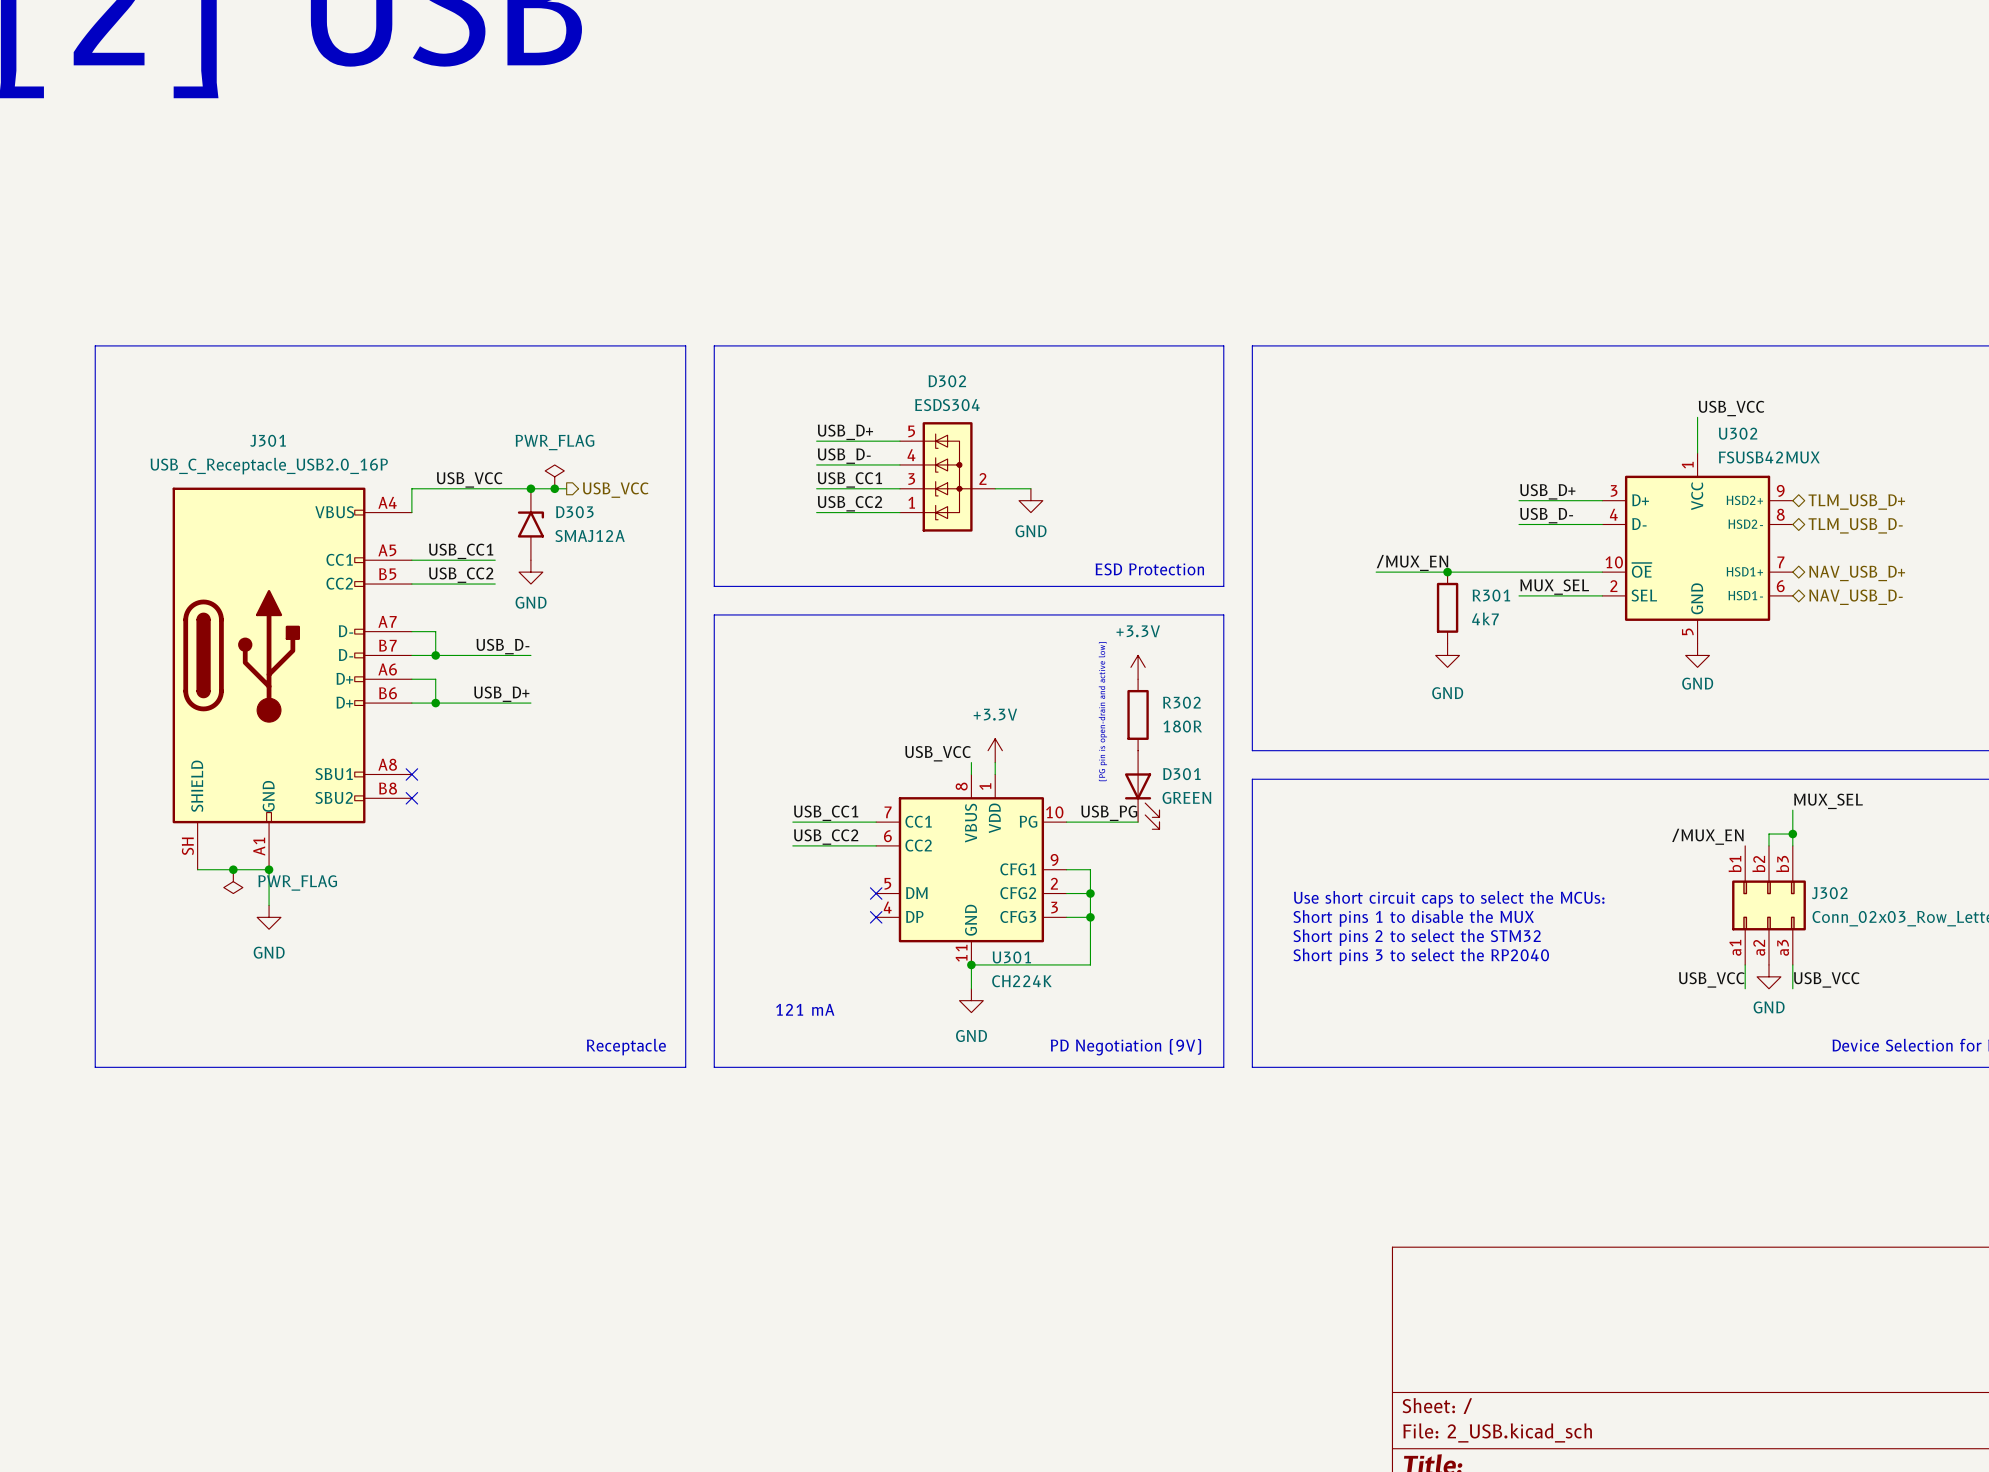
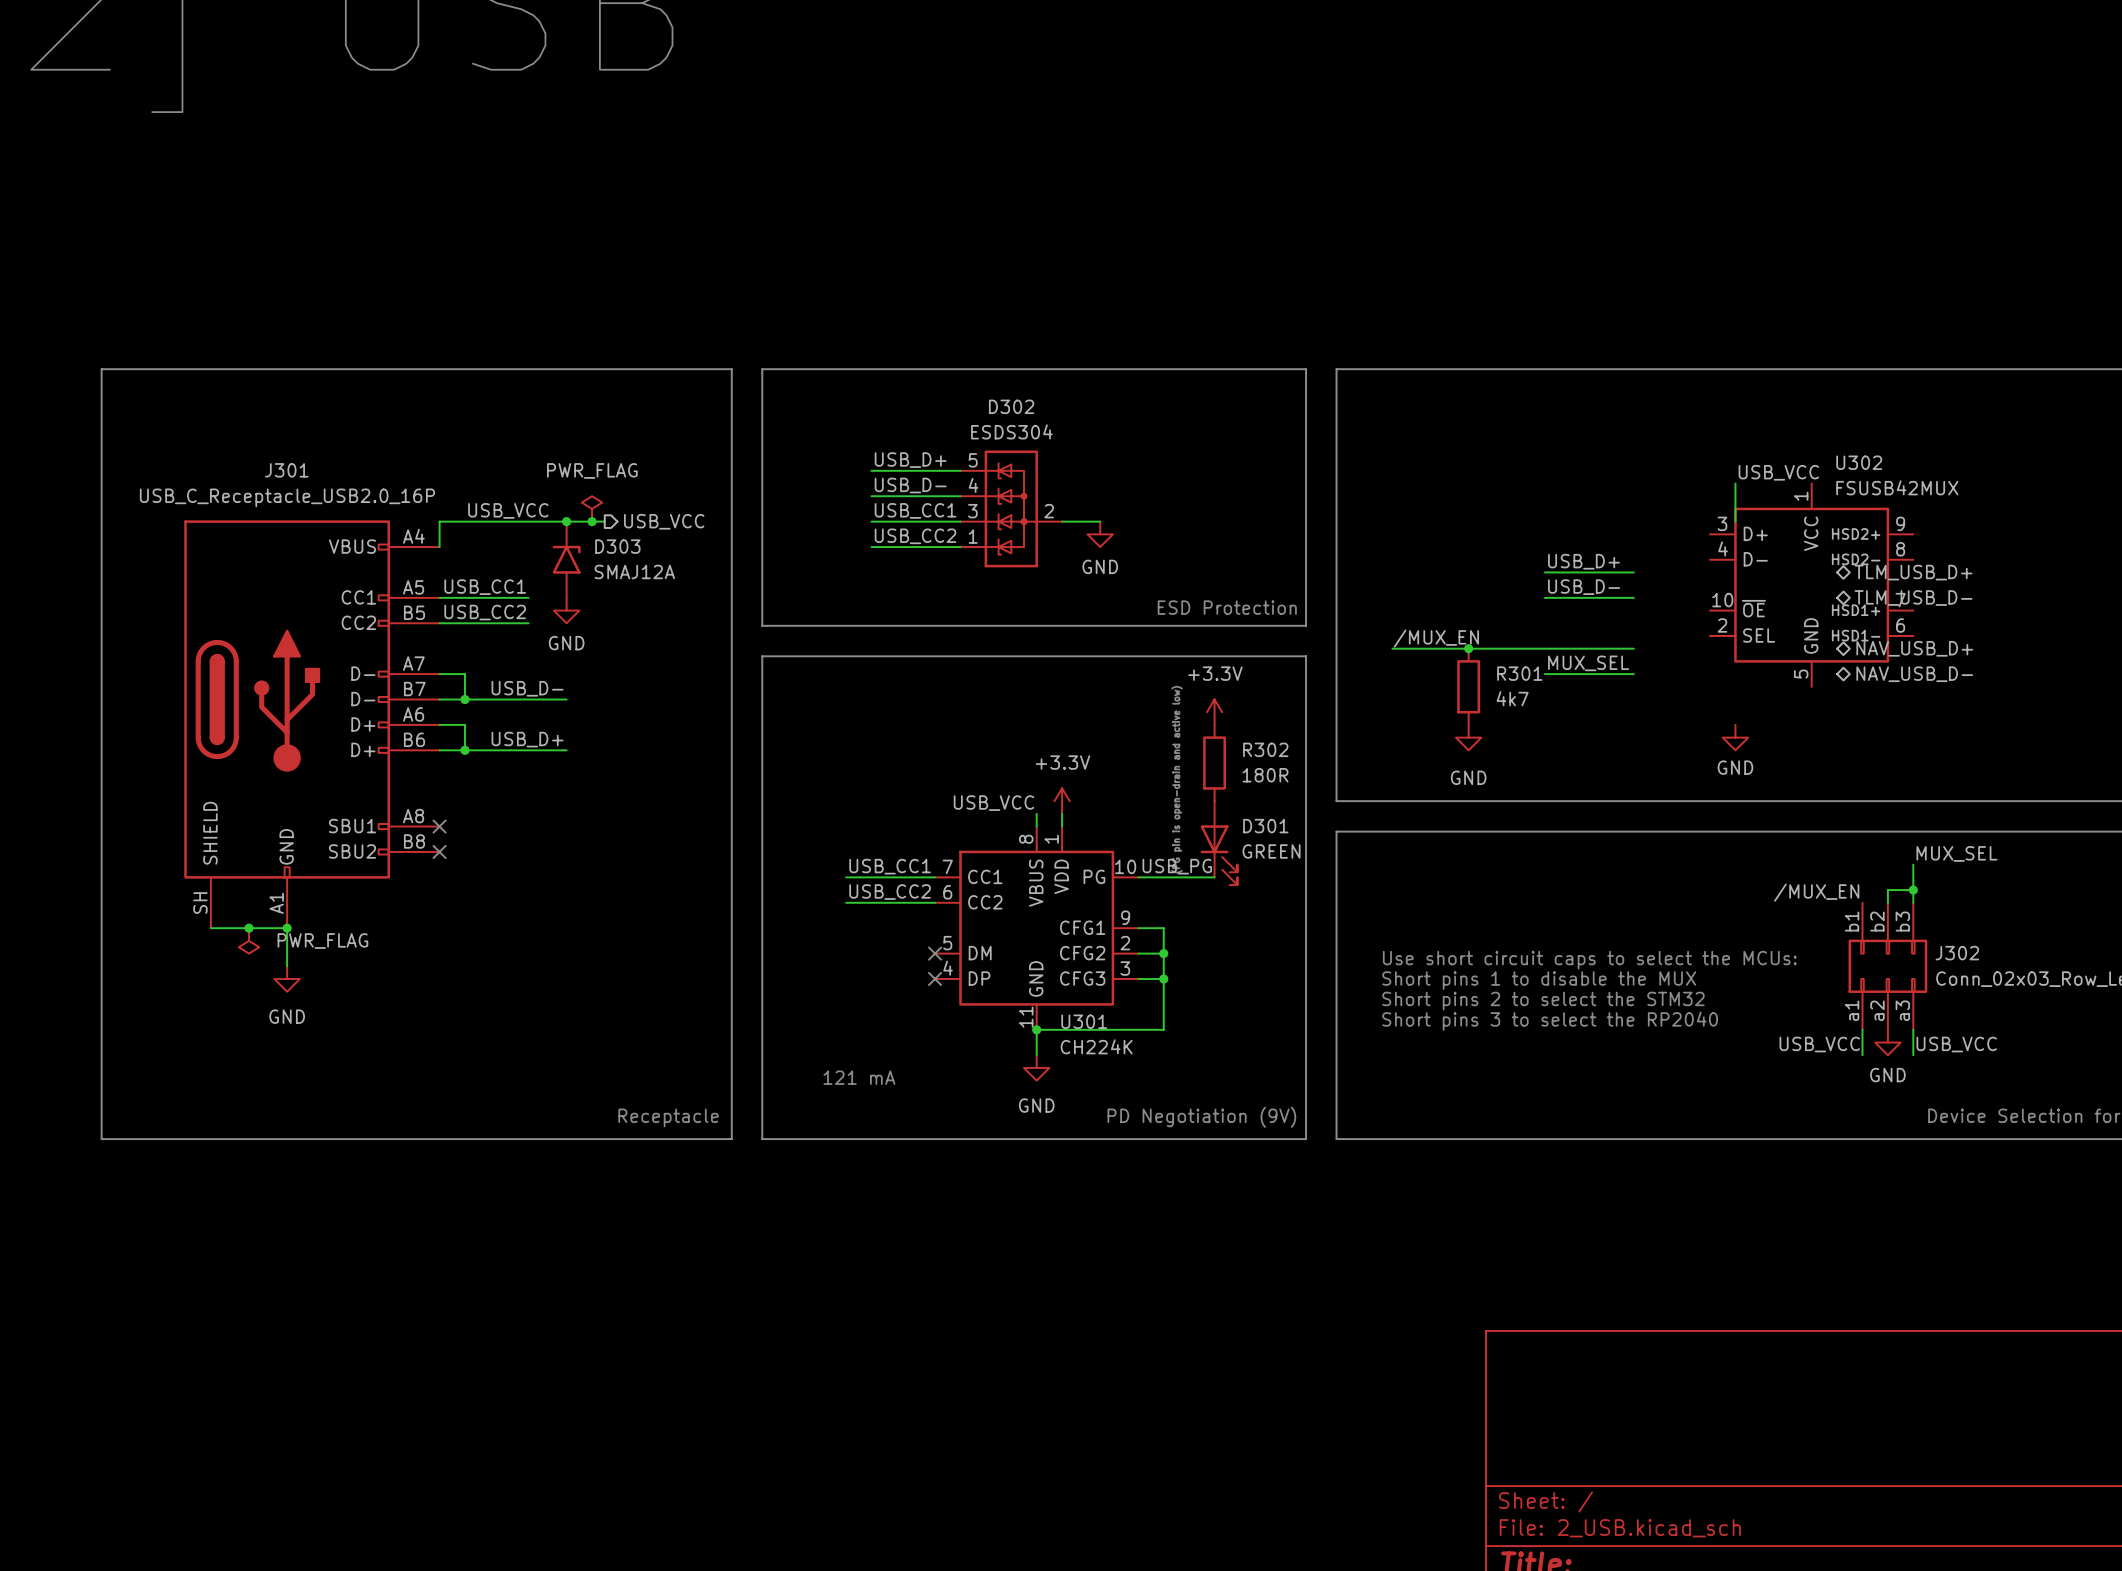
label position: USB_VCC (1731, 408) -> USB_VCC (1778, 472)
wire: (1697, 417) (1697, 453) -> (1735, 483) (1735, 521)
label position: USB_D+ (1547, 491) -> USB_D+ (1584, 561)
wire: (1519, 500) (1602, 500) -> (1544, 572) (1633, 572)
hierarchical label position: TLM_USB_D+ (1856, 502) -> TLM_USB_D+ (1913, 572)
label position: USB_D- (1546, 515) -> USB_D- (1584, 587)
wire: (1519, 524) (1602, 524) -> (1544, 597) (1633, 597)
hierarchical label position: TLM_USB_D- (1855, 525) -> TLM_USB_D- (1913, 598)
label position: /MUX_EN (1412, 562) -> /MUX_EN (1436, 638)
wire: (1376, 572) (1602, 572) -> (1392, 648) (1633, 648)
junction: (1447, 572) -> none
hierarchical label position: NAV_USB_D+ (1857, 573) -> NAV_USB_D+ (1914, 648)
label position: MUX_SEL (1554, 587) -> MUX_SEL (1588, 663)
wire: (1519, 595) (1602, 595) -> (1544, 674) (1633, 674)
hierarchical label position: NAV_USB_D- (1855, 597) -> NAV_USB_D- (1914, 674)
junction: none -> (1468, 648)
R301 position: (1447, 607) -> (1468, 686)
power symbol position: GND (1447, 655) -> GND (1468, 737)
power symbol position: GND (1697, 655) -> GND (1735, 737)

